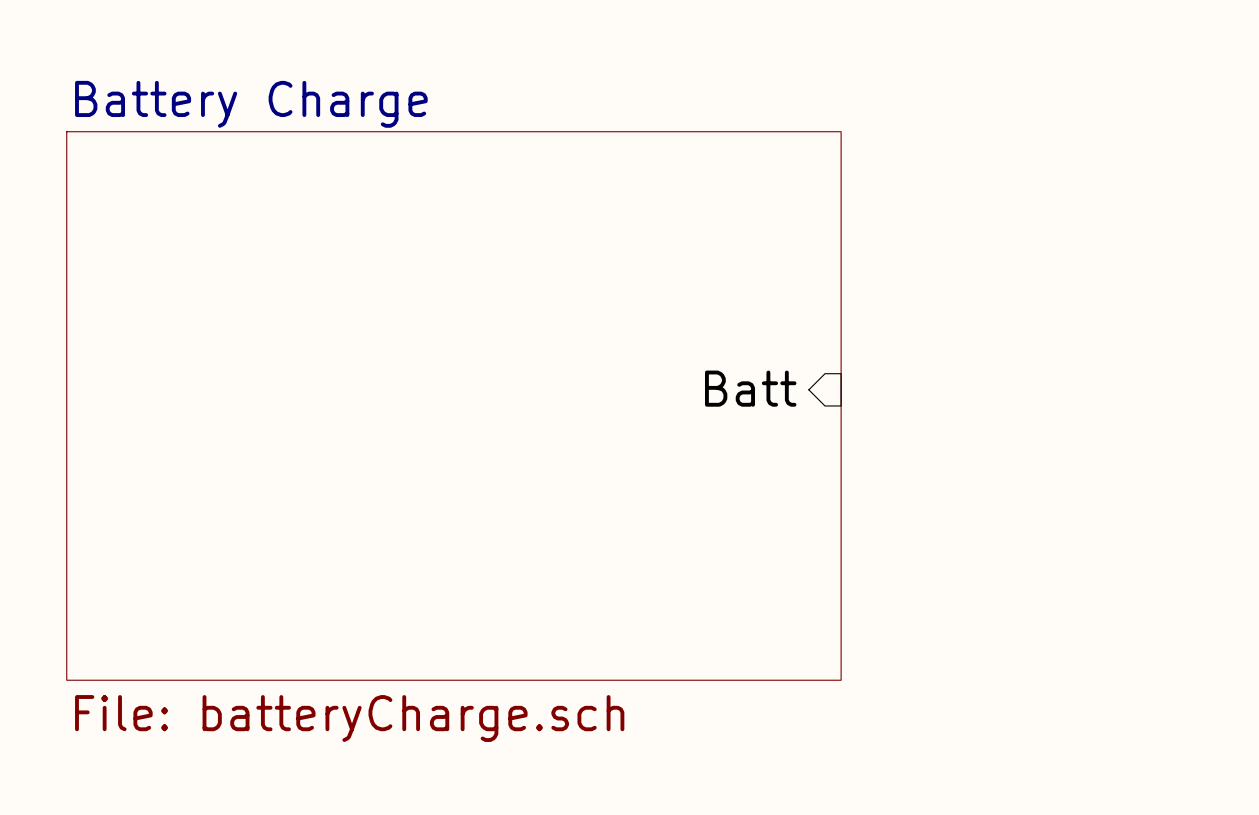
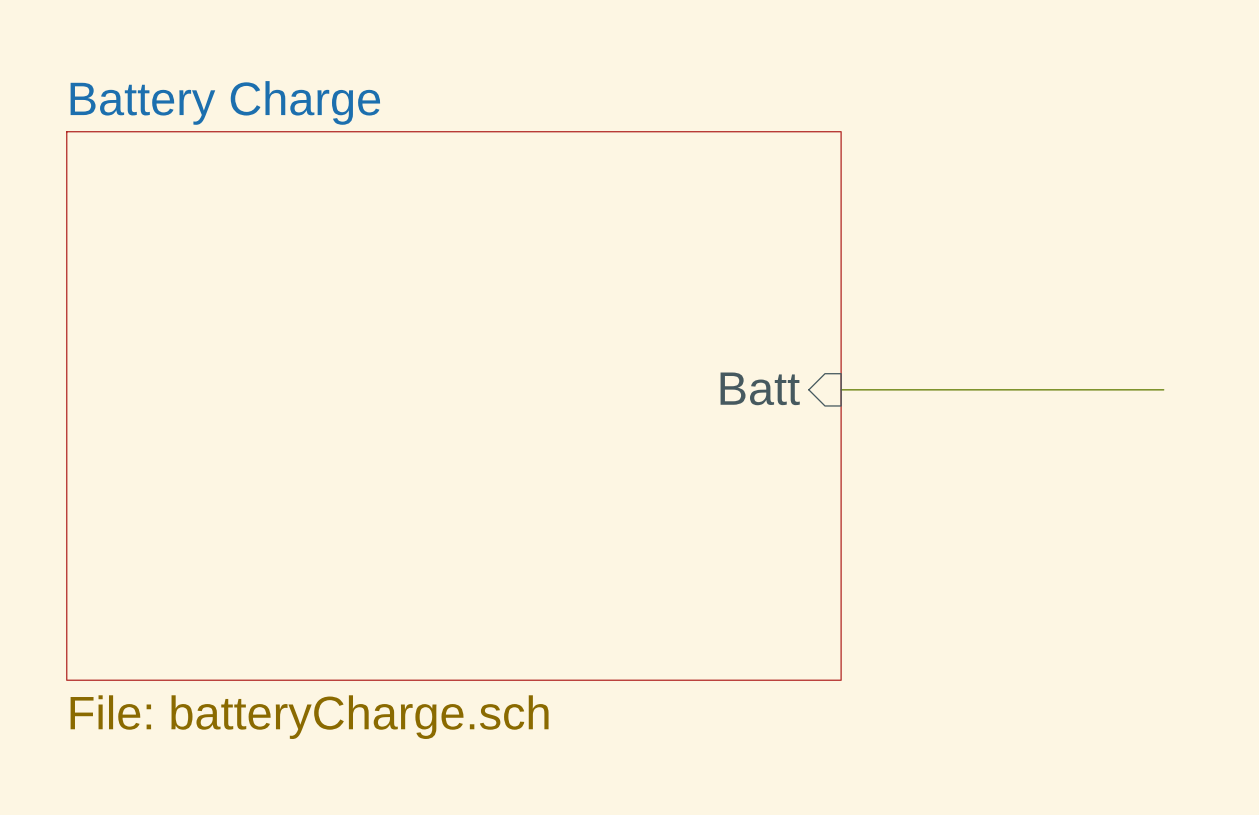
wire: none -> (841, 389) (1163, 389)

